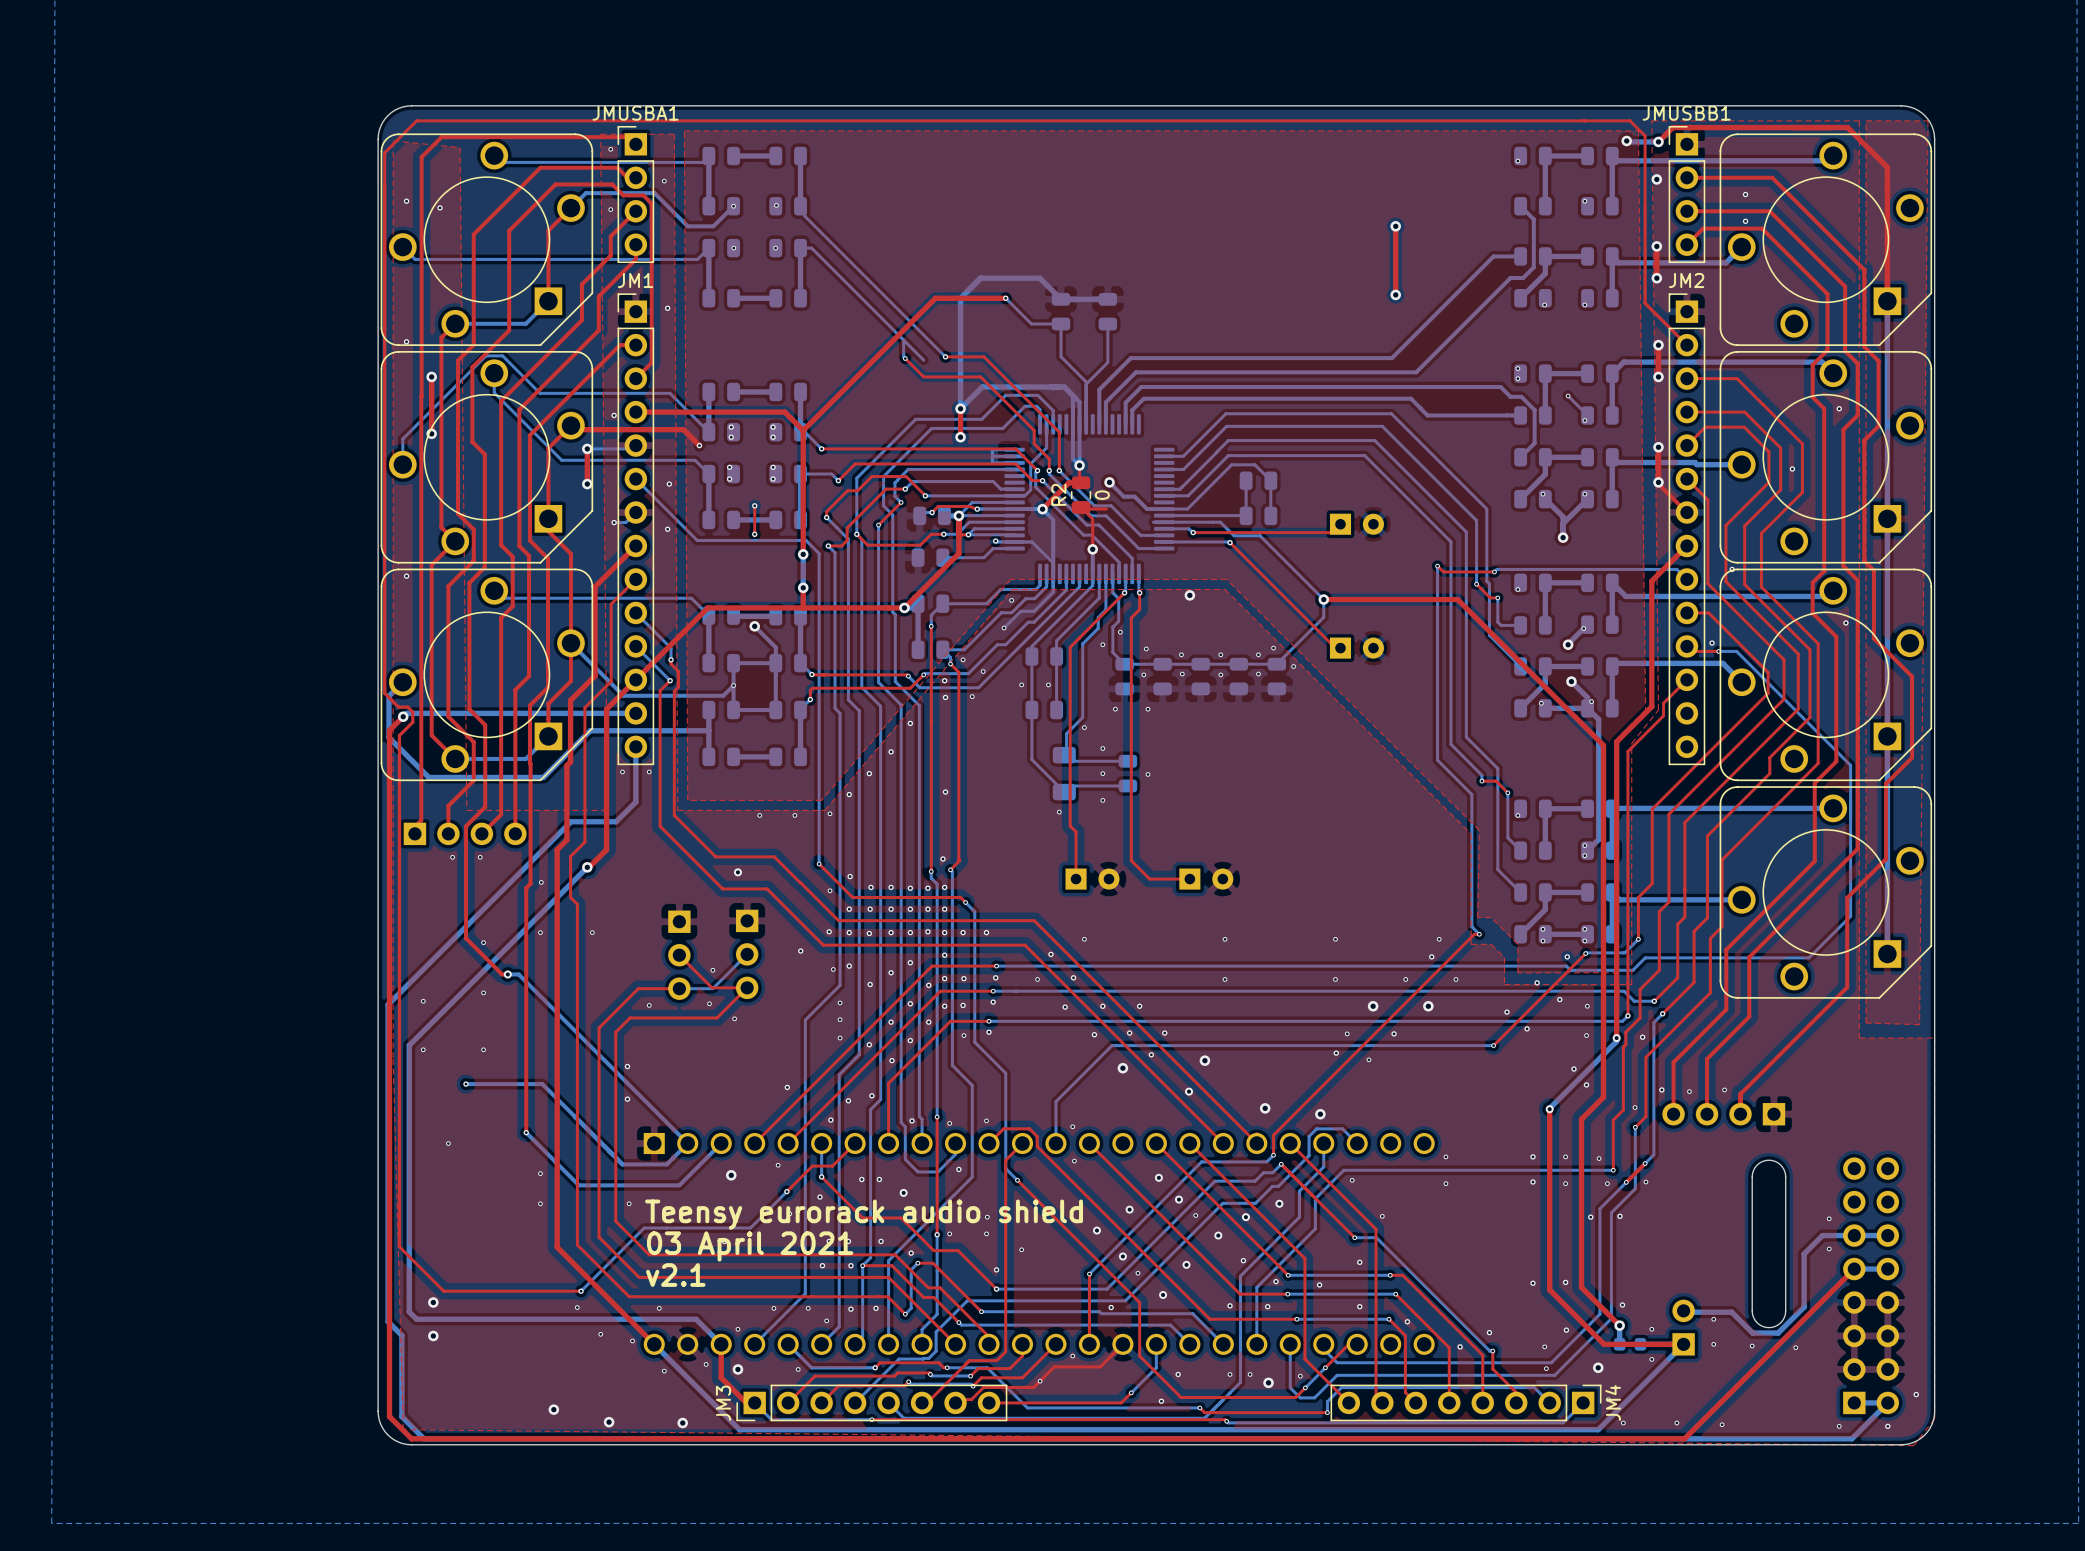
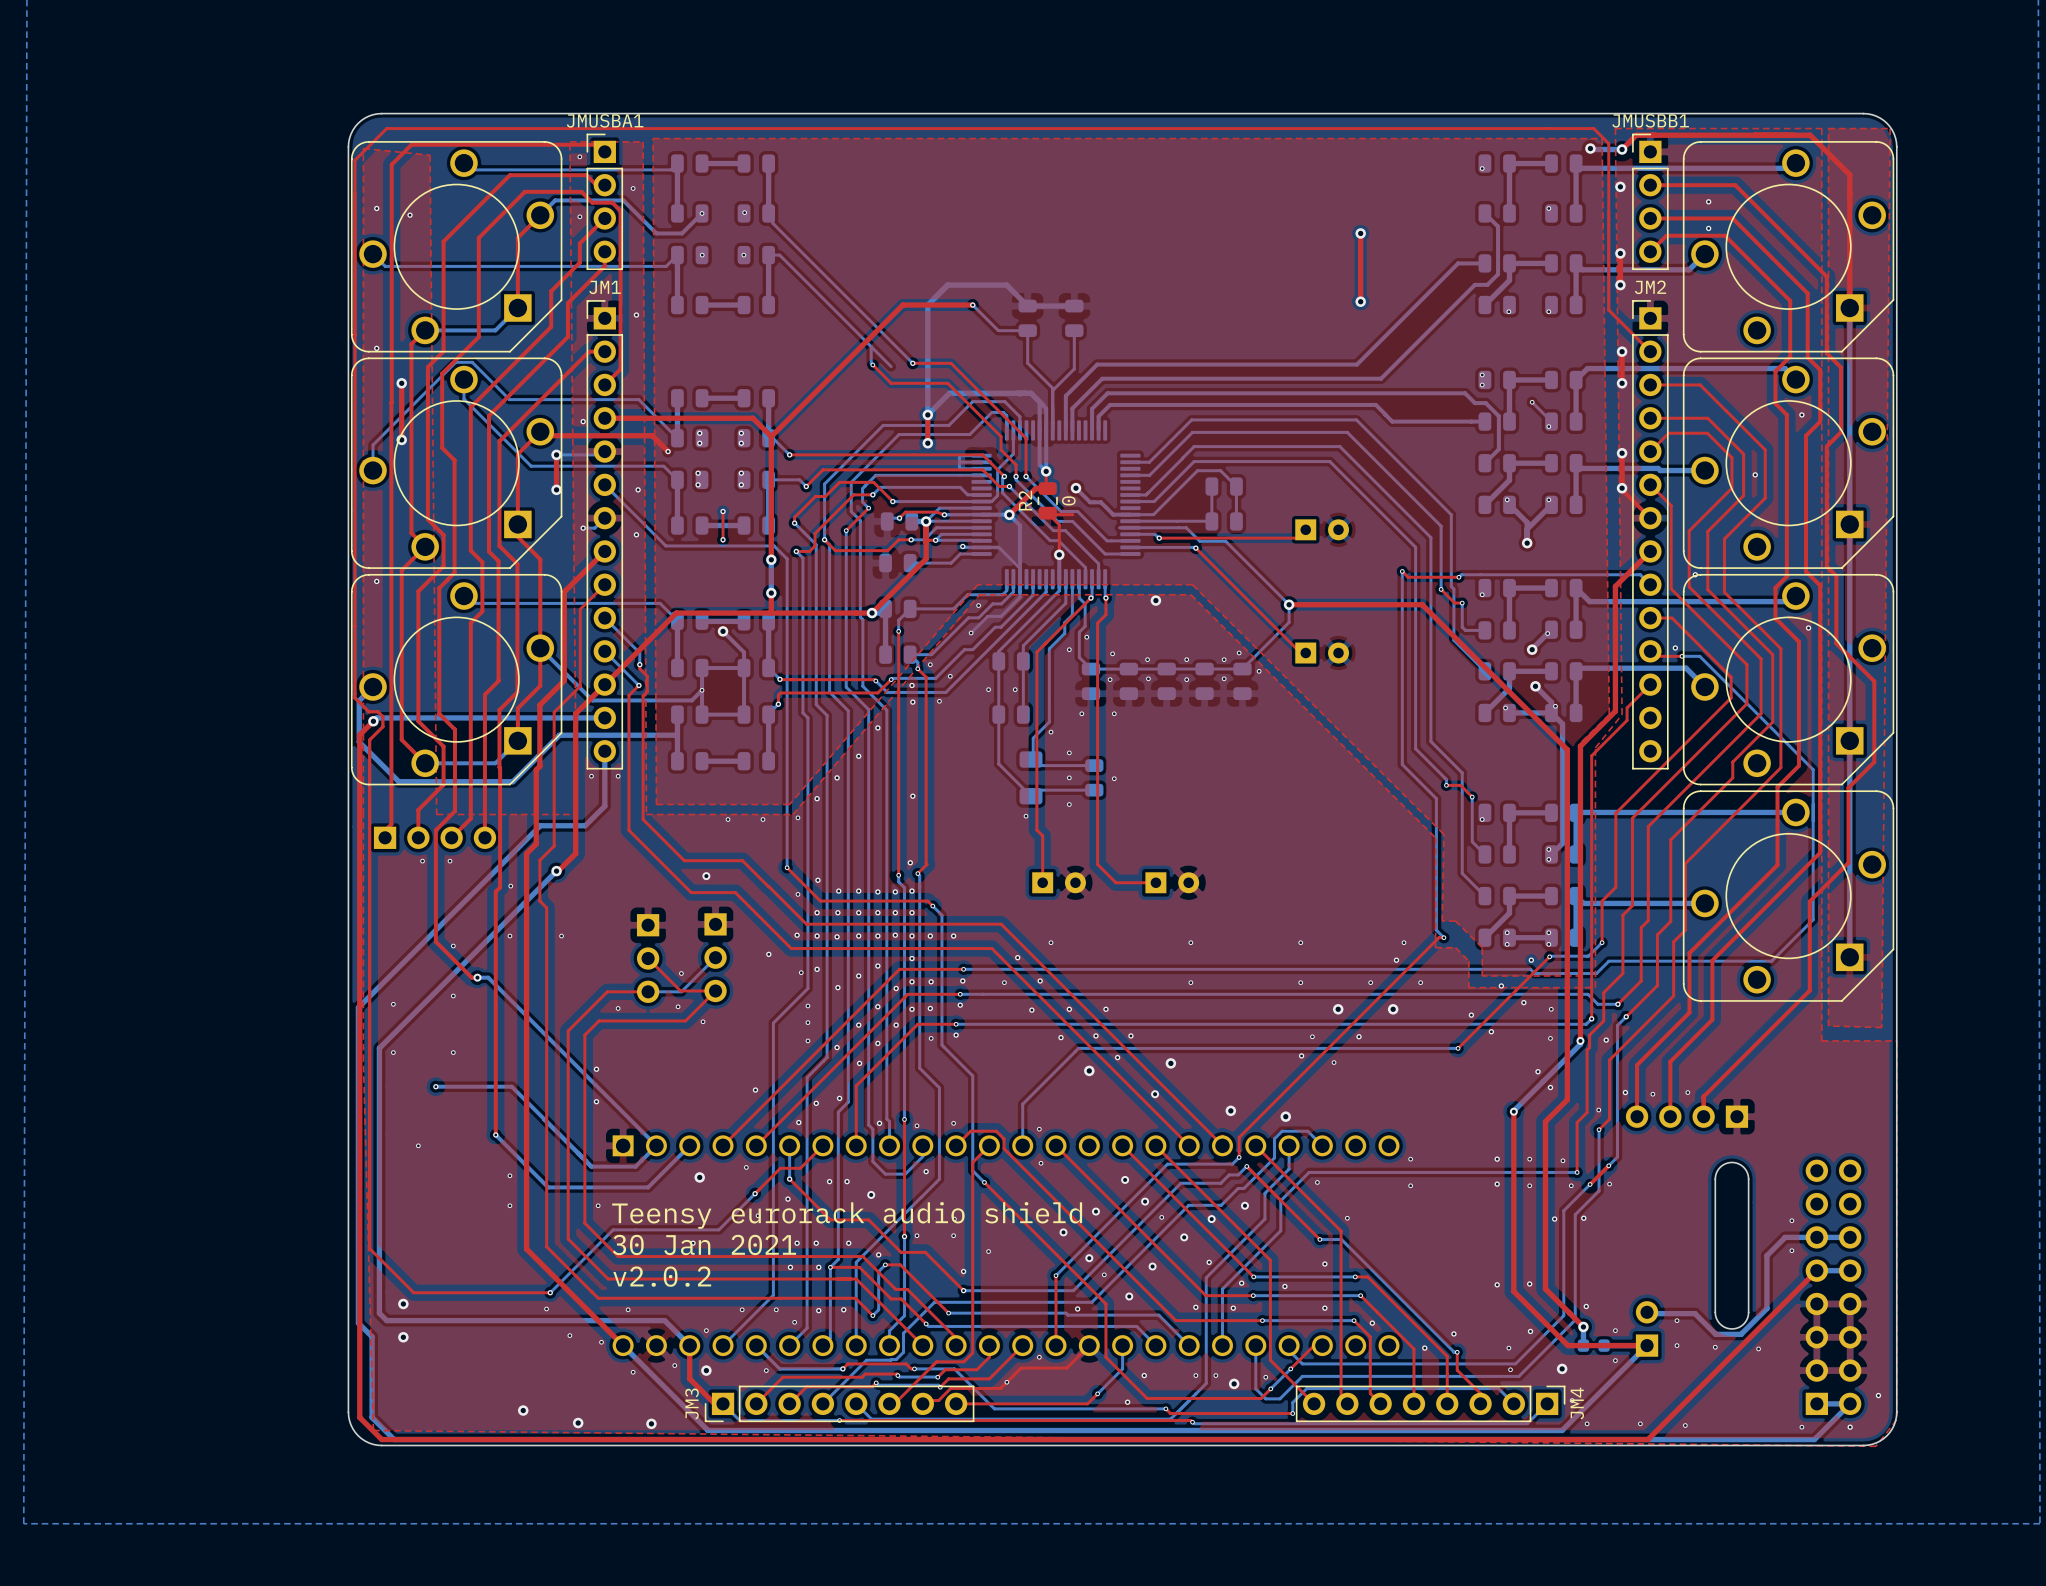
text: 03 April 2021 (750, 1246) -> 30 Jan 2021 (704, 1244)
text: v2.1 (675, 1275) -> v2.0.2 (662, 1276)

